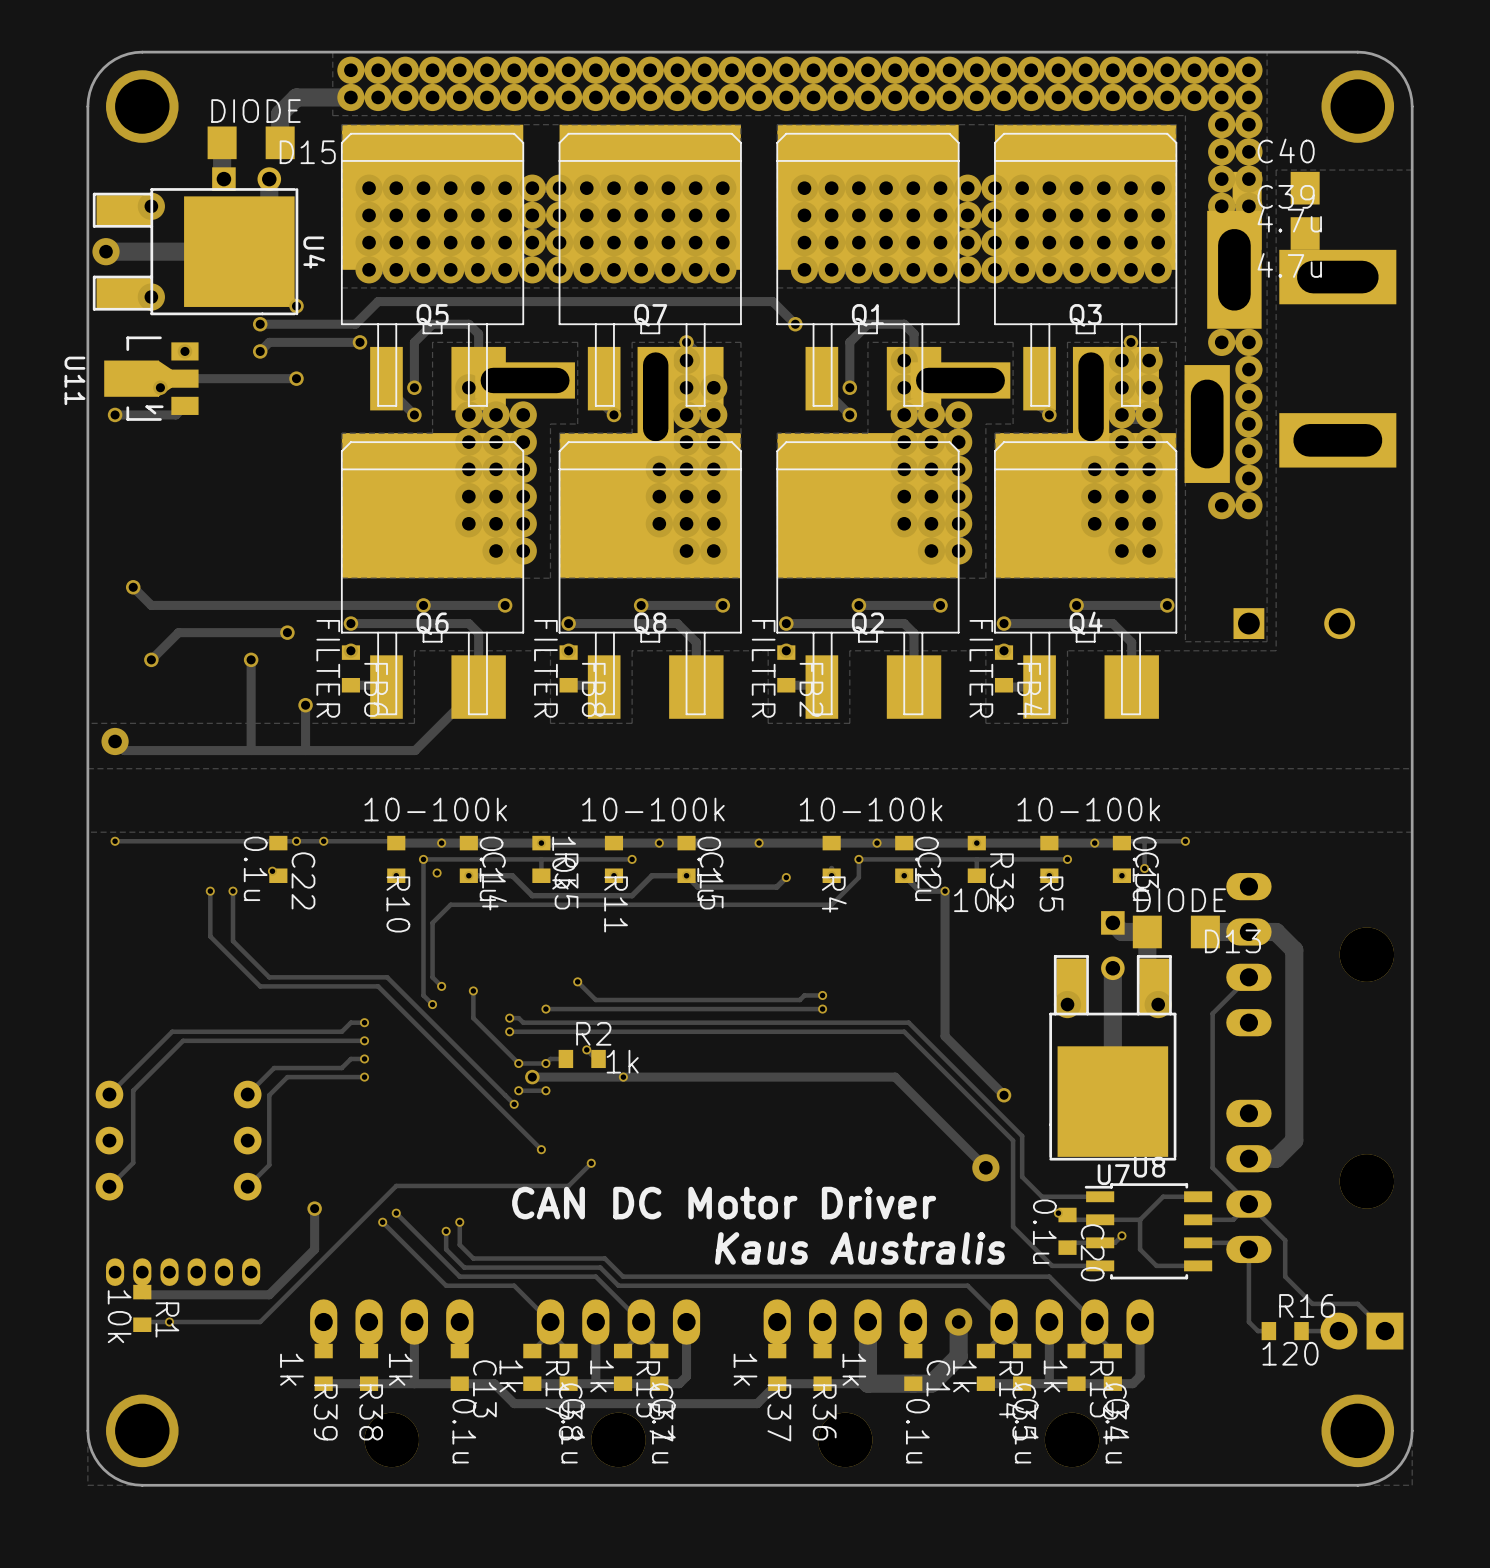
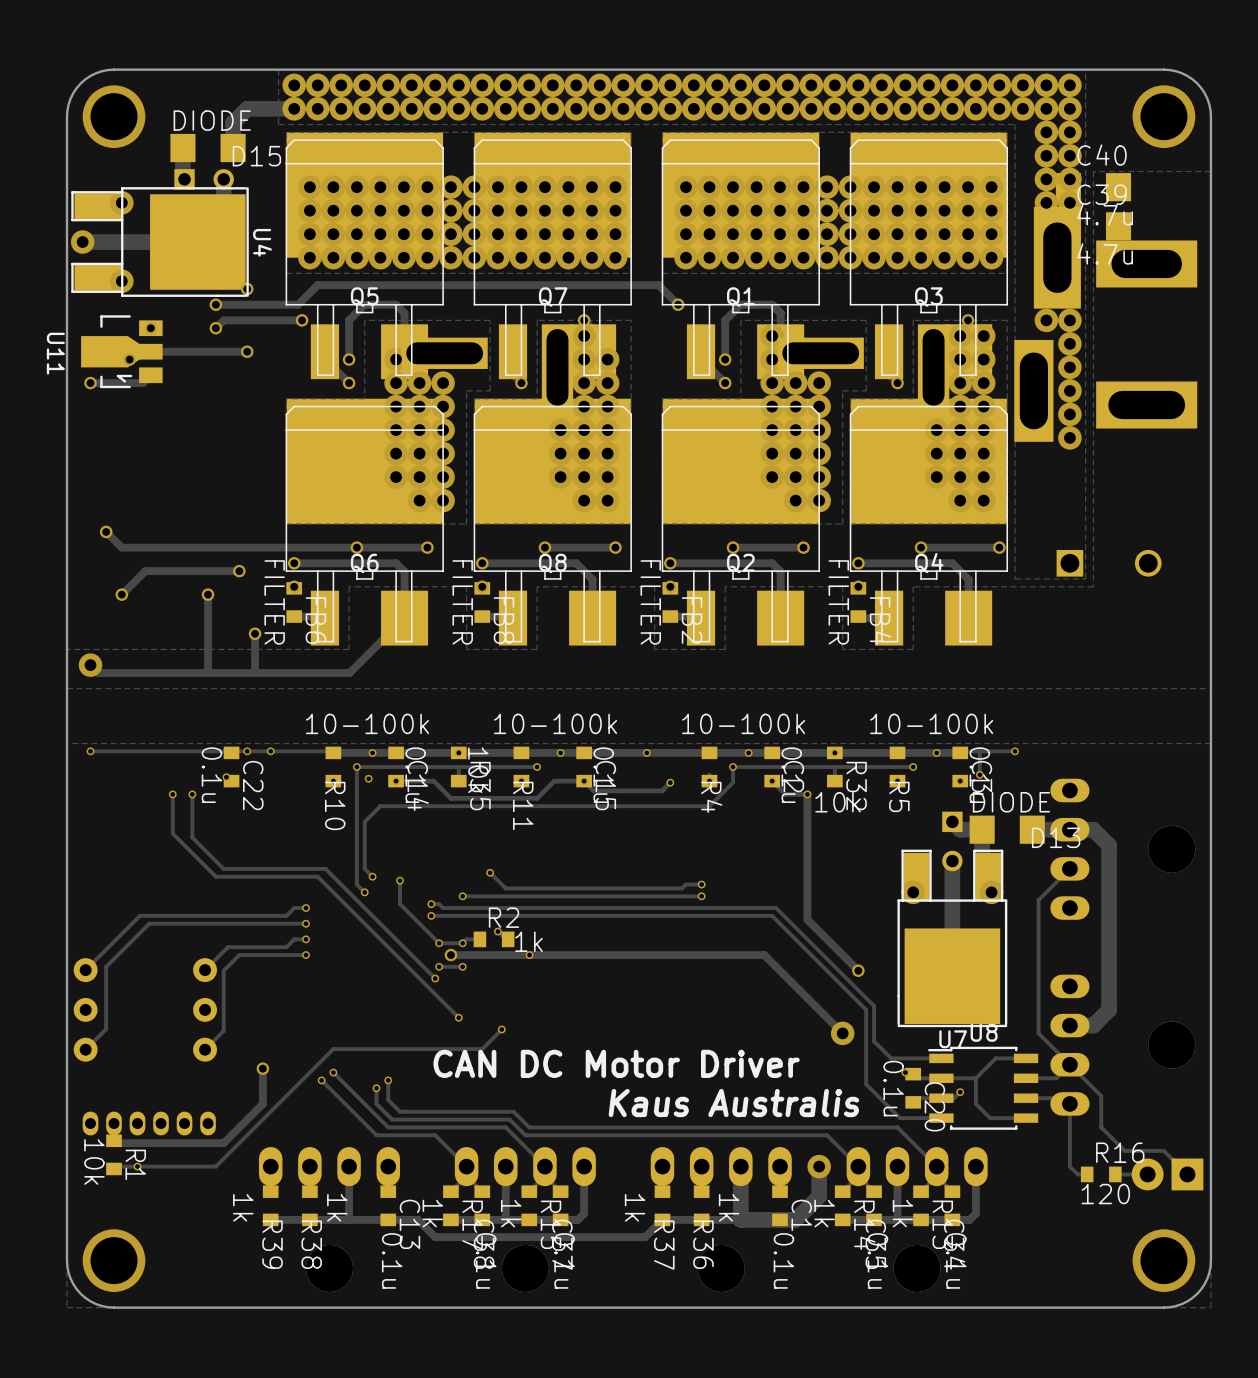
via: (1221, 505) -> none
via: (1248, 505) -> none

